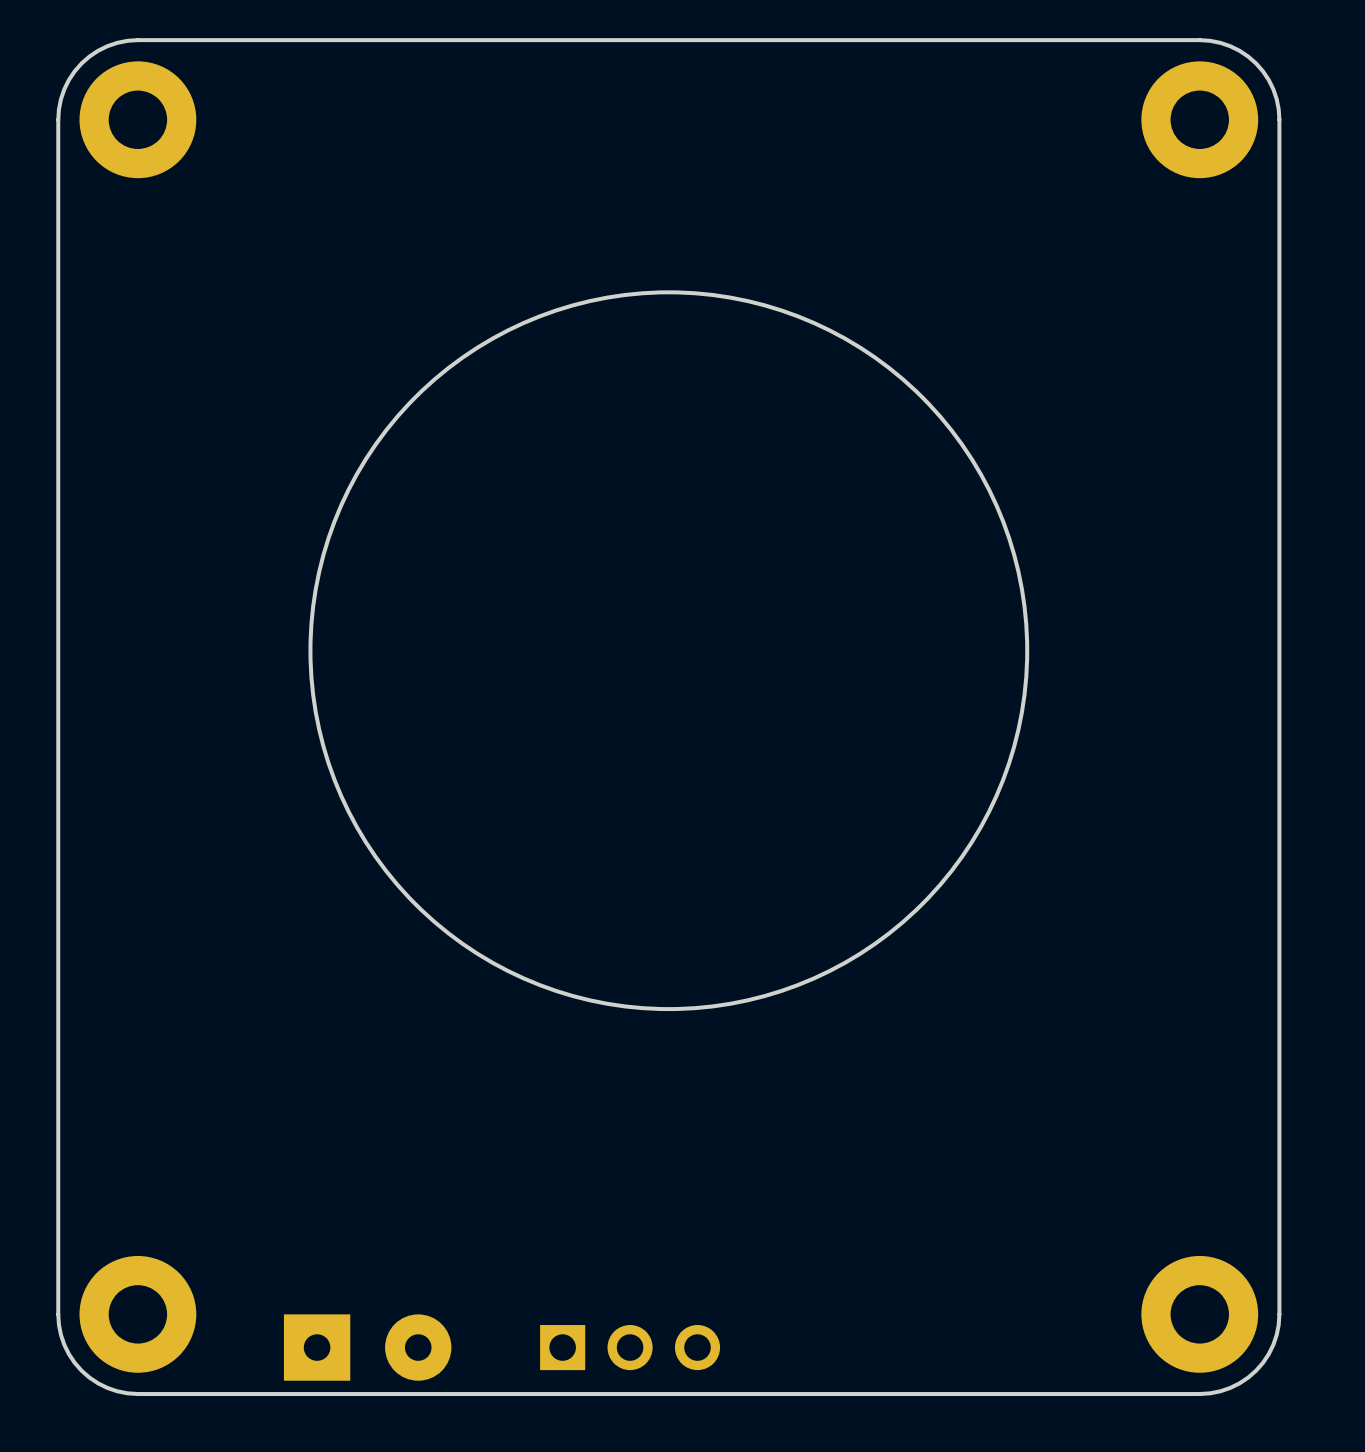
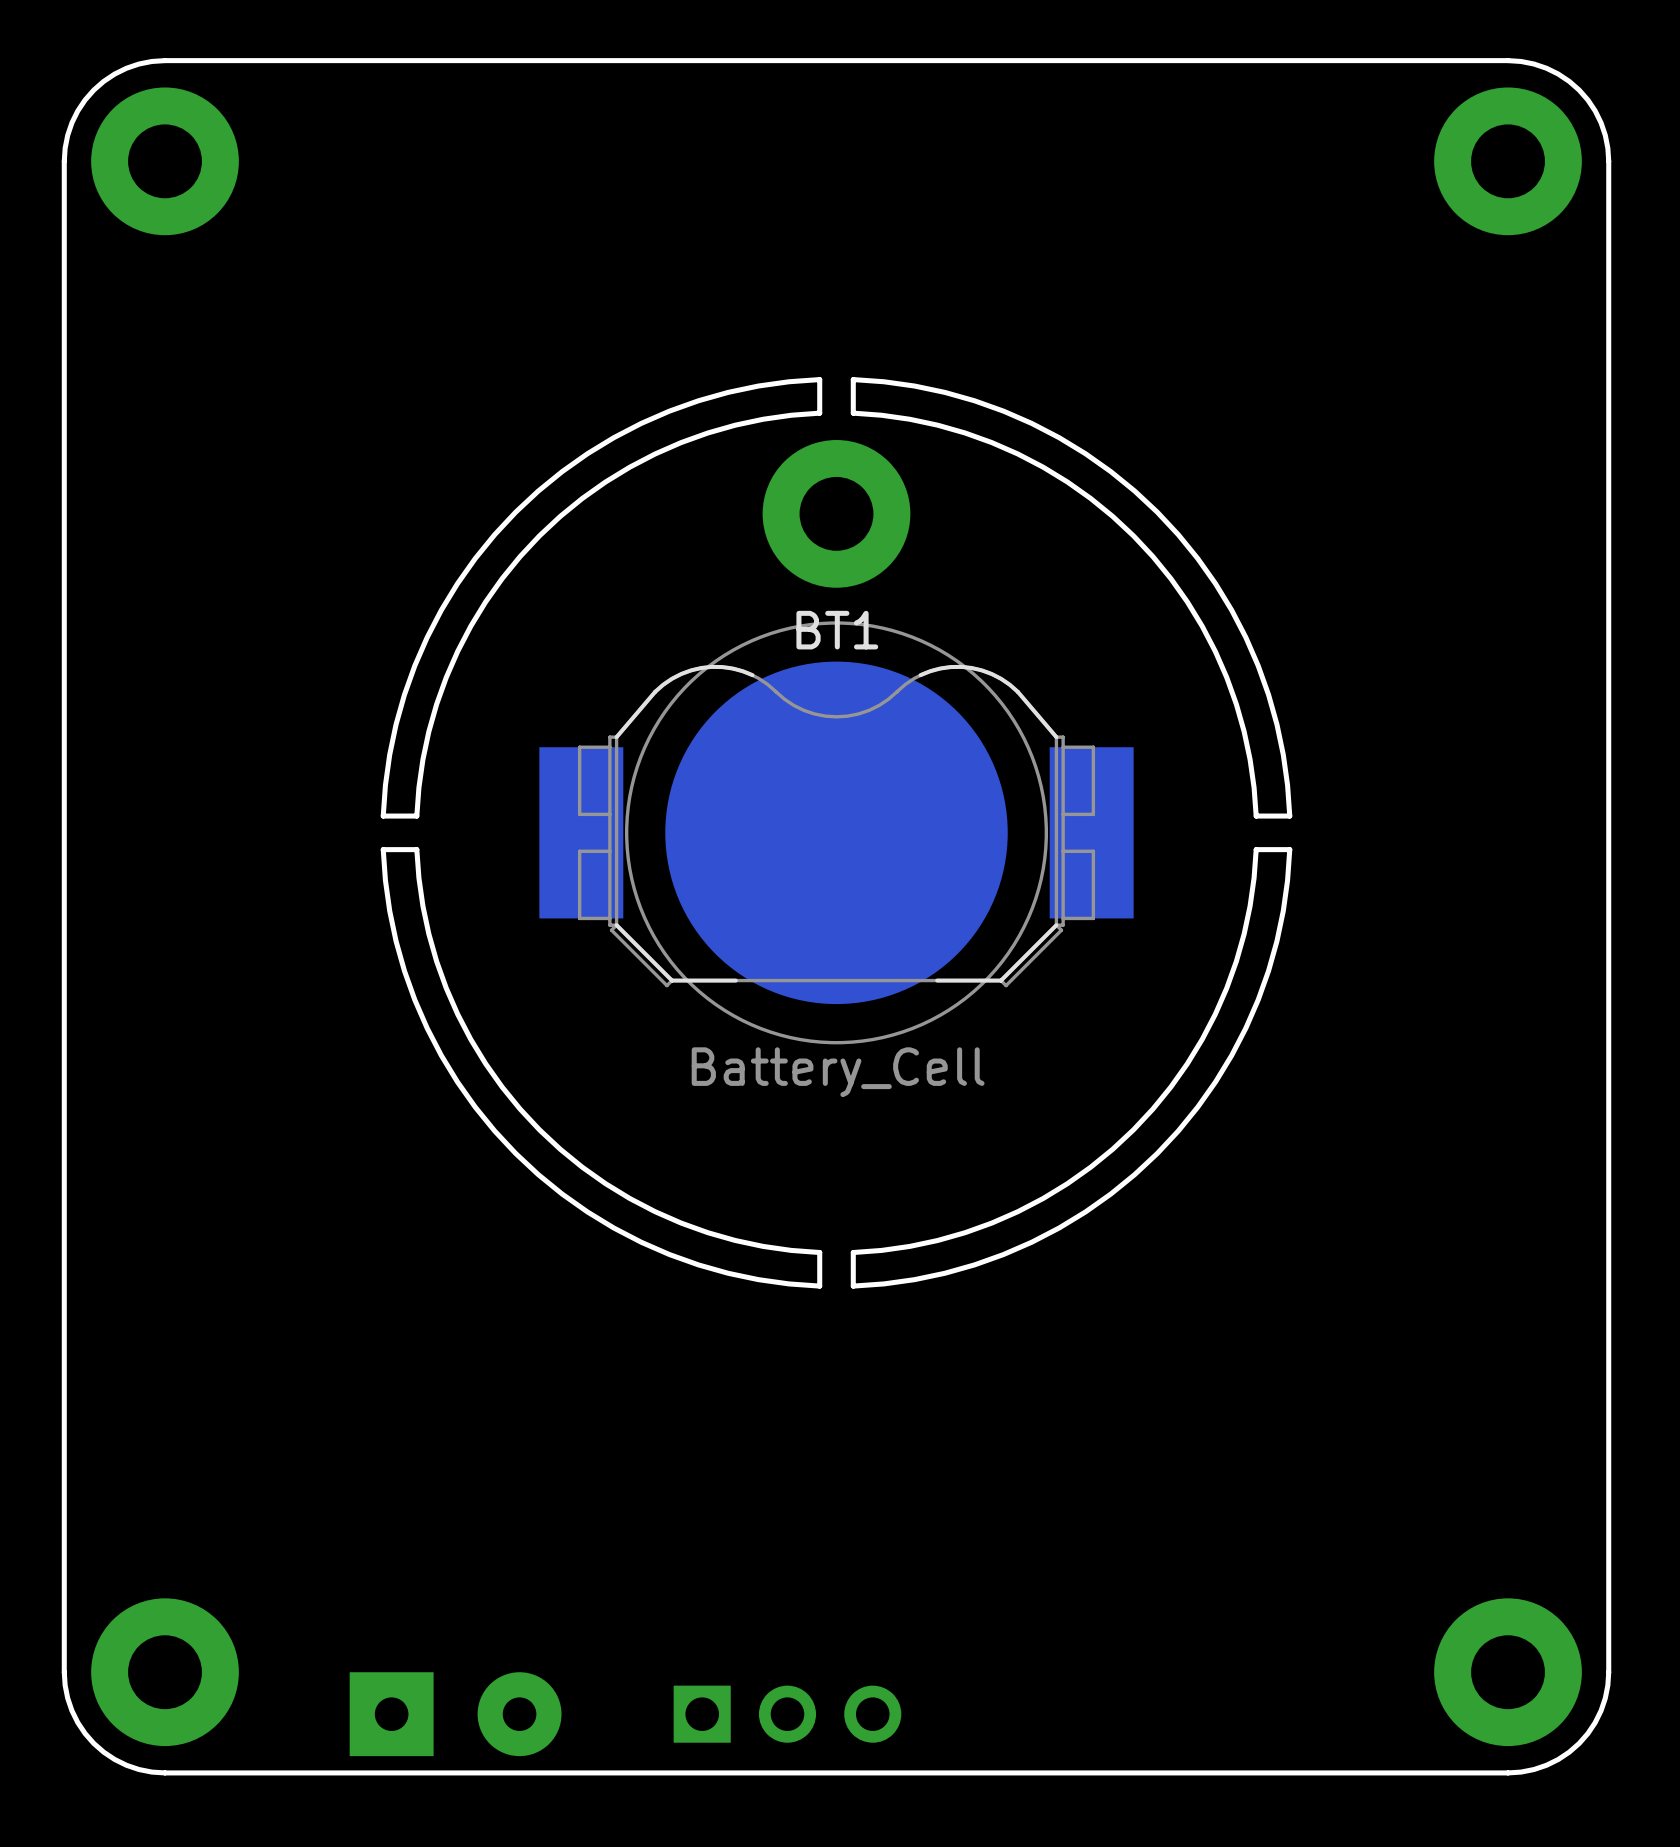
round board edge: [308, 290, 1030, 1012] -> none
board edge: none -> (819, 379) (819, 413) (763, 419) (735, 425) (707, 432) (655, 454) (605, 481) (582, 498) (539, 535) (502, 578) (470, 626) (457, 651) (436, 704) (428, 731) (418, 787) (416, 816) (383, 816) (389, 754) (404, 694) (414, 665) (427, 637) (457, 583) (475, 558) (515, 512) (538, 491) (587, 453) (641, 423) (698, 400) (728, 392) (788, 381) (819, 379)
board edge: none -> (853, 379) (853, 413) (909, 419) (965, 432) (991, 442) (1043, 467) (1067, 481) (1090, 498) (1133, 535) (1170, 578) (1187, 601) (1215, 651) (1236, 704) (1244, 731) (1254, 787) (1256, 816) (1289, 816) (1283, 754) (1276, 724) (1268, 694) (1245, 637) (1215, 583) (1178, 534) (1157, 512) (1110, 471) (1085, 453) (1031, 423) (1003, 411) (974, 400) (914, 386) (853, 379)
part: none -> (836, 513)
BT1: none -> Battery_Cell (836, 832)
board edge: none -> (416, 849) (383, 849) (389, 910) (396, 941) (404, 970) (427, 1028) (457, 1081) (494, 1131) (538, 1174) (562, 1194) (587, 1211) (641, 1242) (698, 1264) (728, 1273) (758, 1279) (819, 1286) (819, 1252) (763, 1246) (735, 1240) (707, 1232) (655, 1211) (629, 1198) (582, 1167) (539, 1129) (520, 1109) (502, 1086) (470, 1039) (446, 988) (436, 961) (422, 906) (416, 849)
board edge: none -> (1289, 849) (1256, 849) (1250, 906) (1236, 961) (1226, 988) (1202, 1039) (1187, 1063) (1170, 1086) (1133, 1129) (1090, 1167) (1067, 1183) (1017, 1211) (965, 1232) (937, 1240) (881, 1250) (853, 1252) (853, 1286) (914, 1279) (944, 1273) (974, 1264) (1031, 1242) (1085, 1211) (1134, 1174) (1157, 1153) (1197, 1107) (1215, 1081) (1245, 1028) (1258, 999) (1268, 970) (1283, 910) (1289, 849)

